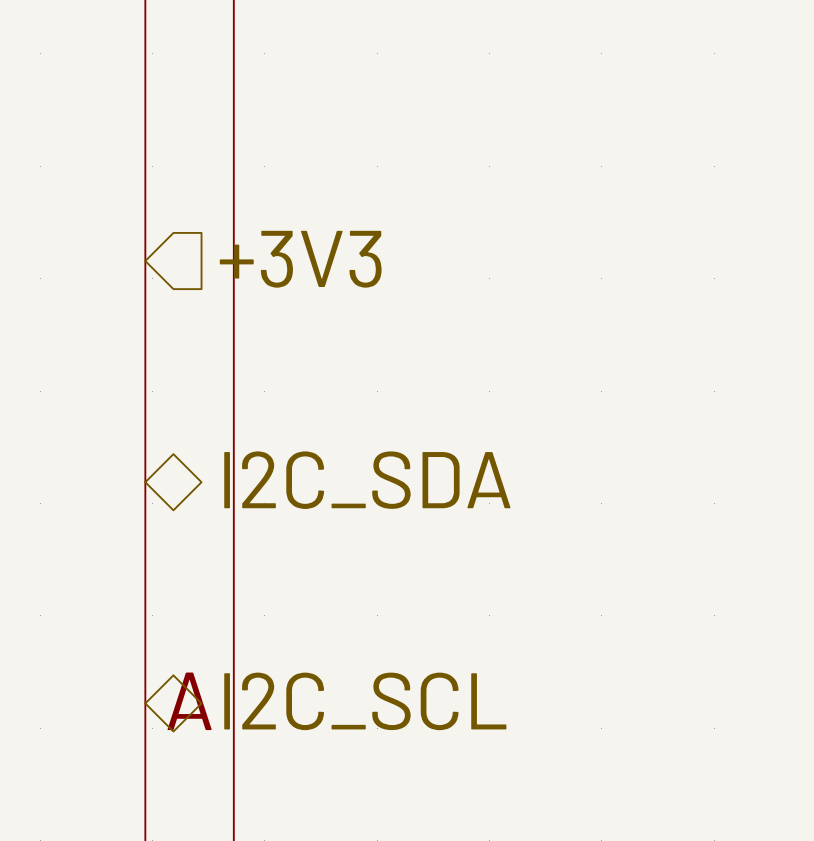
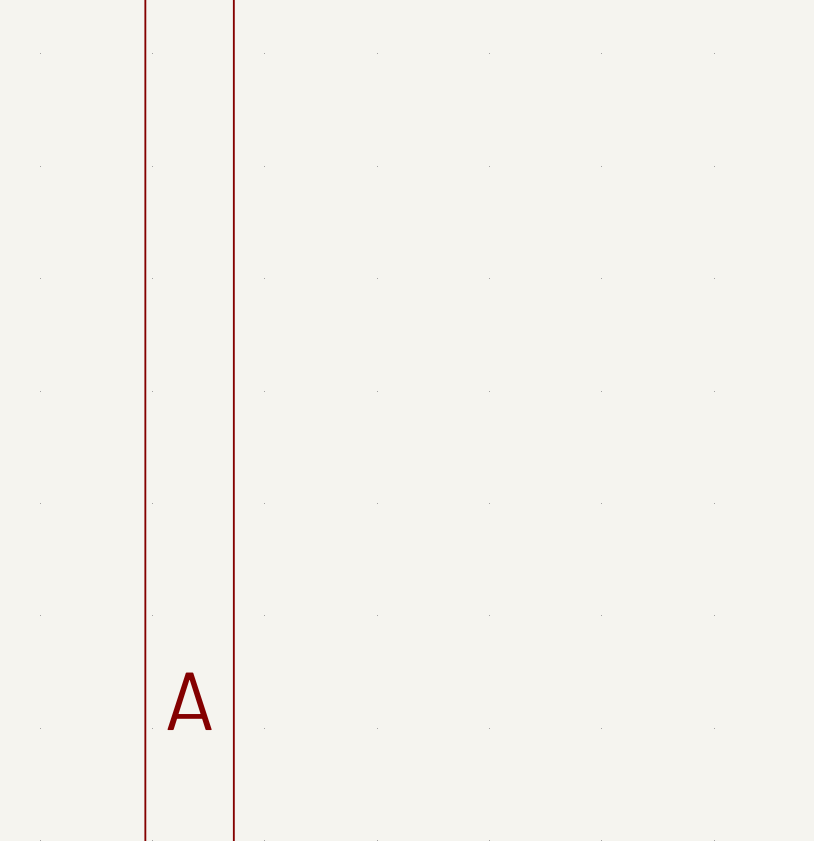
hierarchical label: +3V3 (300, 259) -> none
hierarchical label: I2C_SDA (367, 480) -> none
hierarchical label: I2C_SCL (365, 701) -> none

